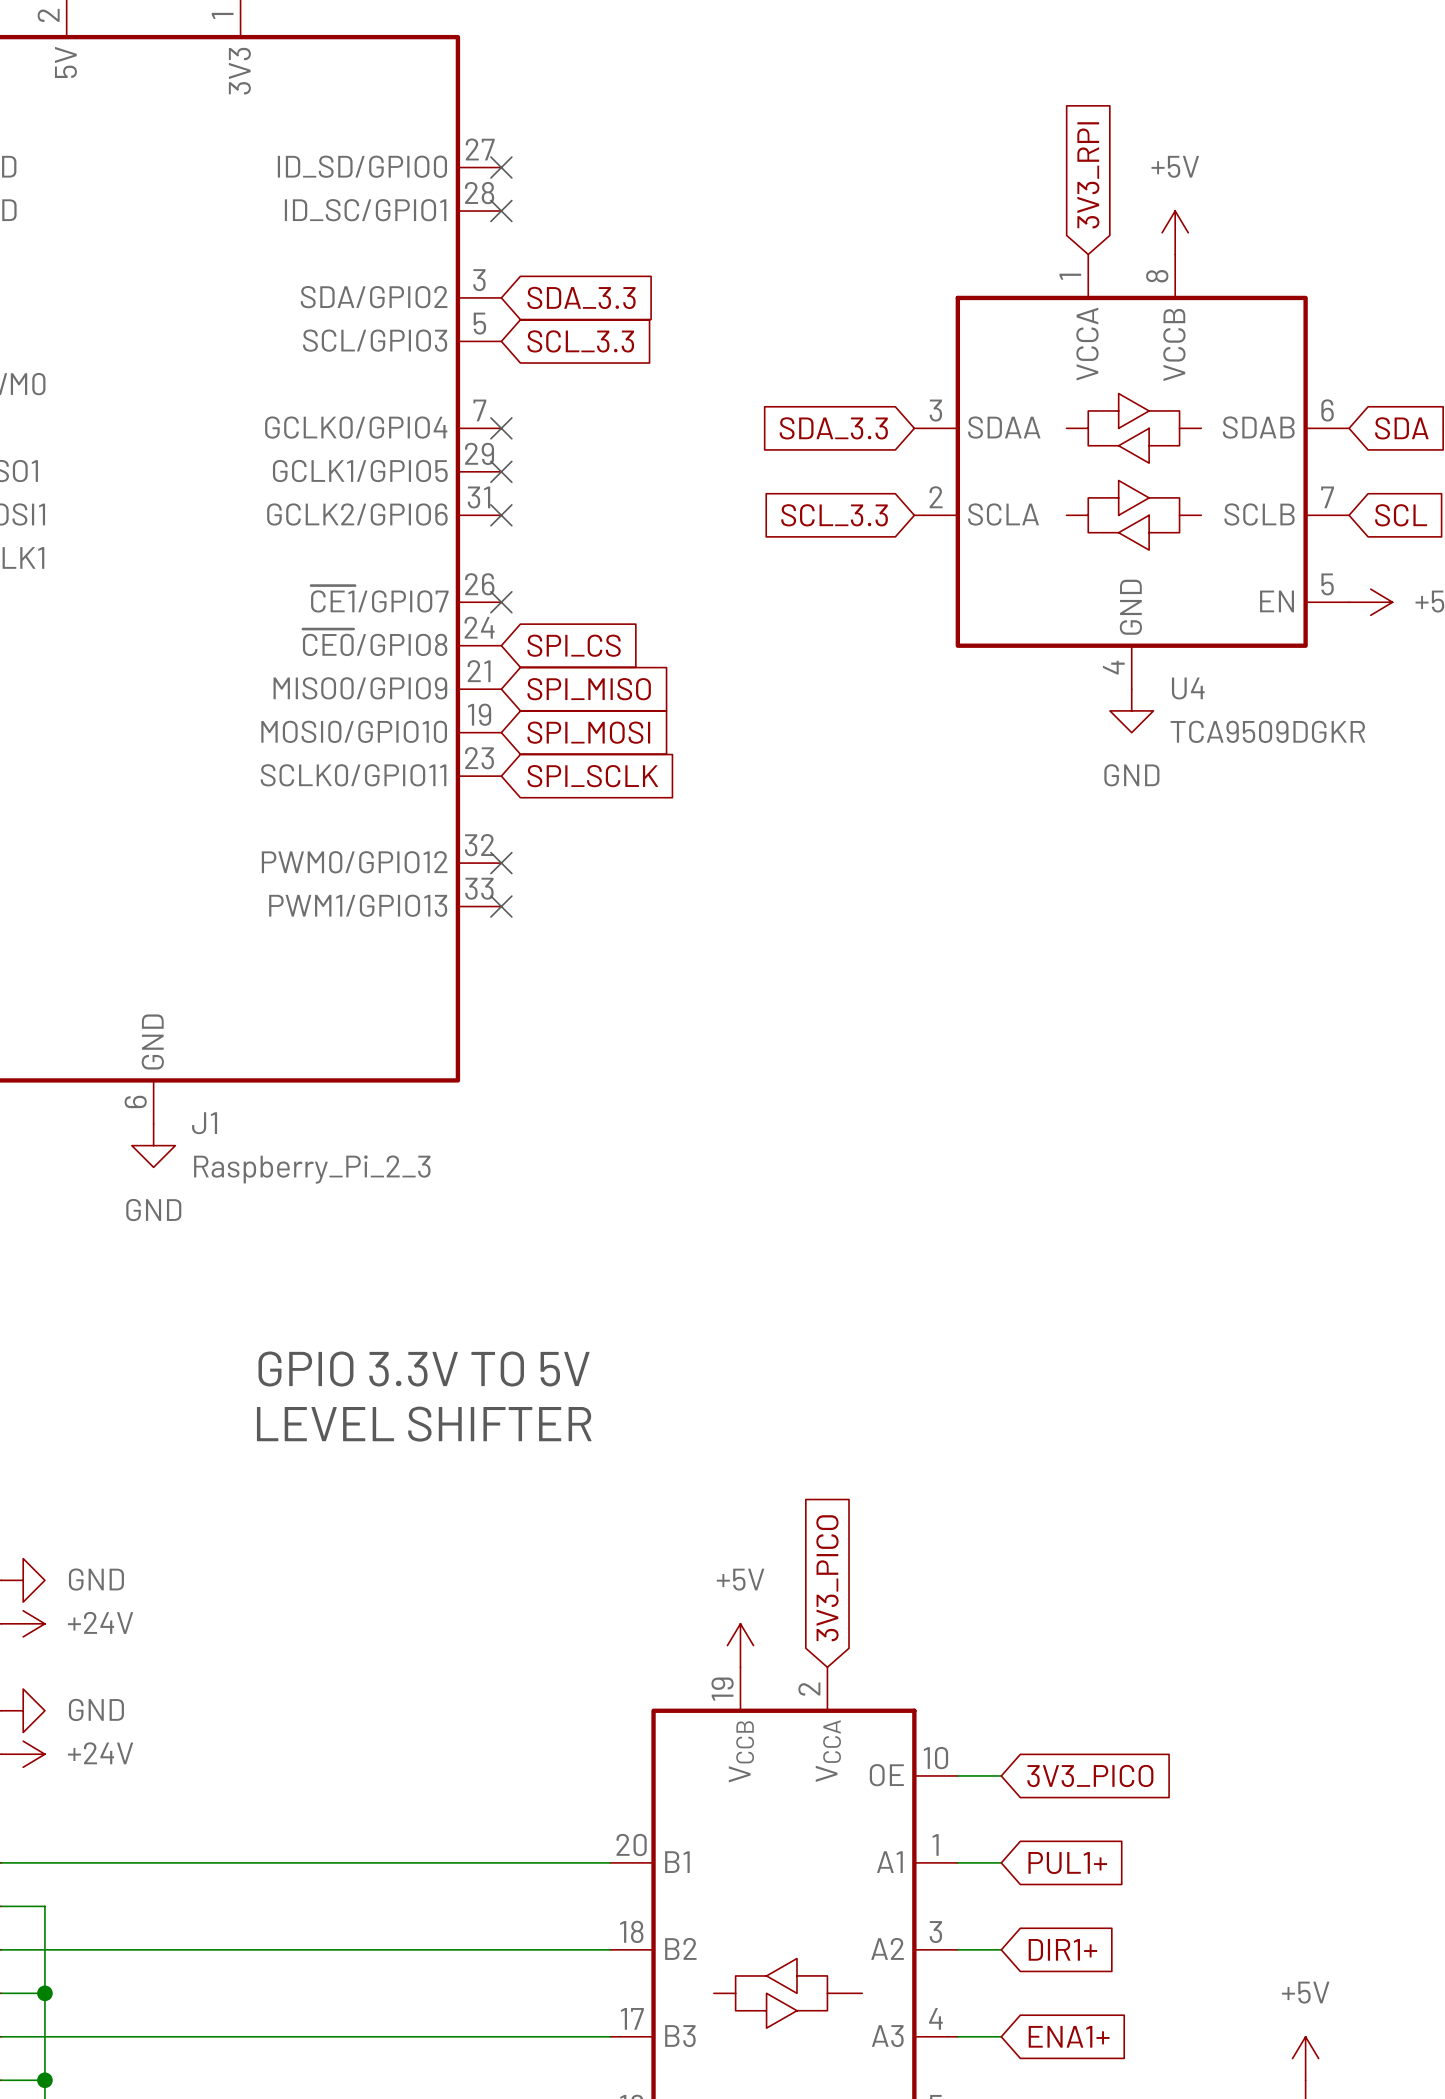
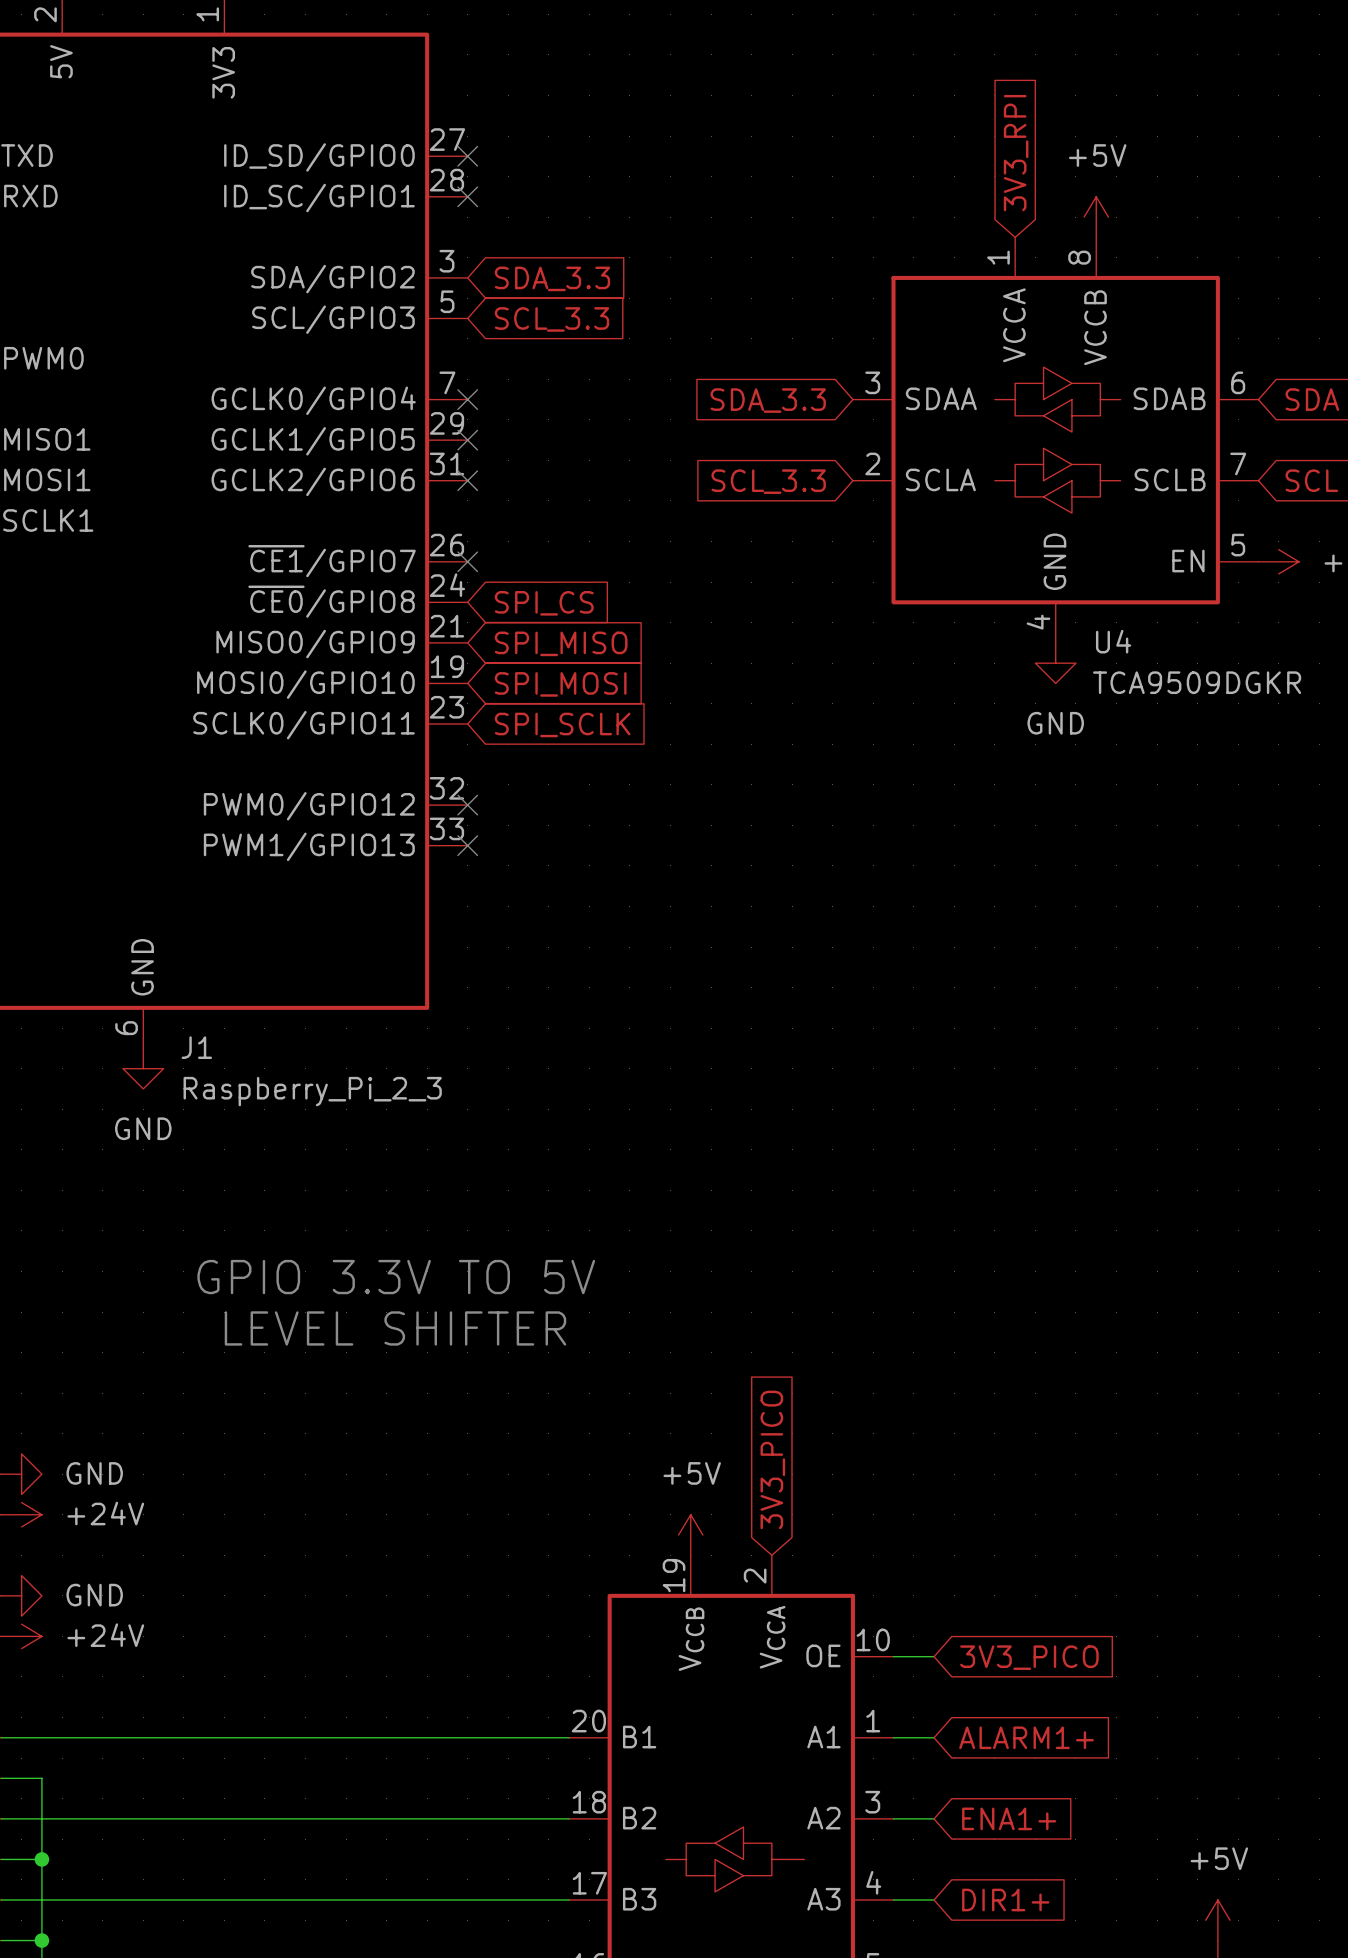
global label: PUL1+ (1067, 1863) -> ALARM1+ (1026, 1737)
global label: DIR1+ (1062, 1949) -> ENA1+ (1009, 1818)
global label: ENA1+ (1069, 2036) -> DIR1+ (1005, 1899)

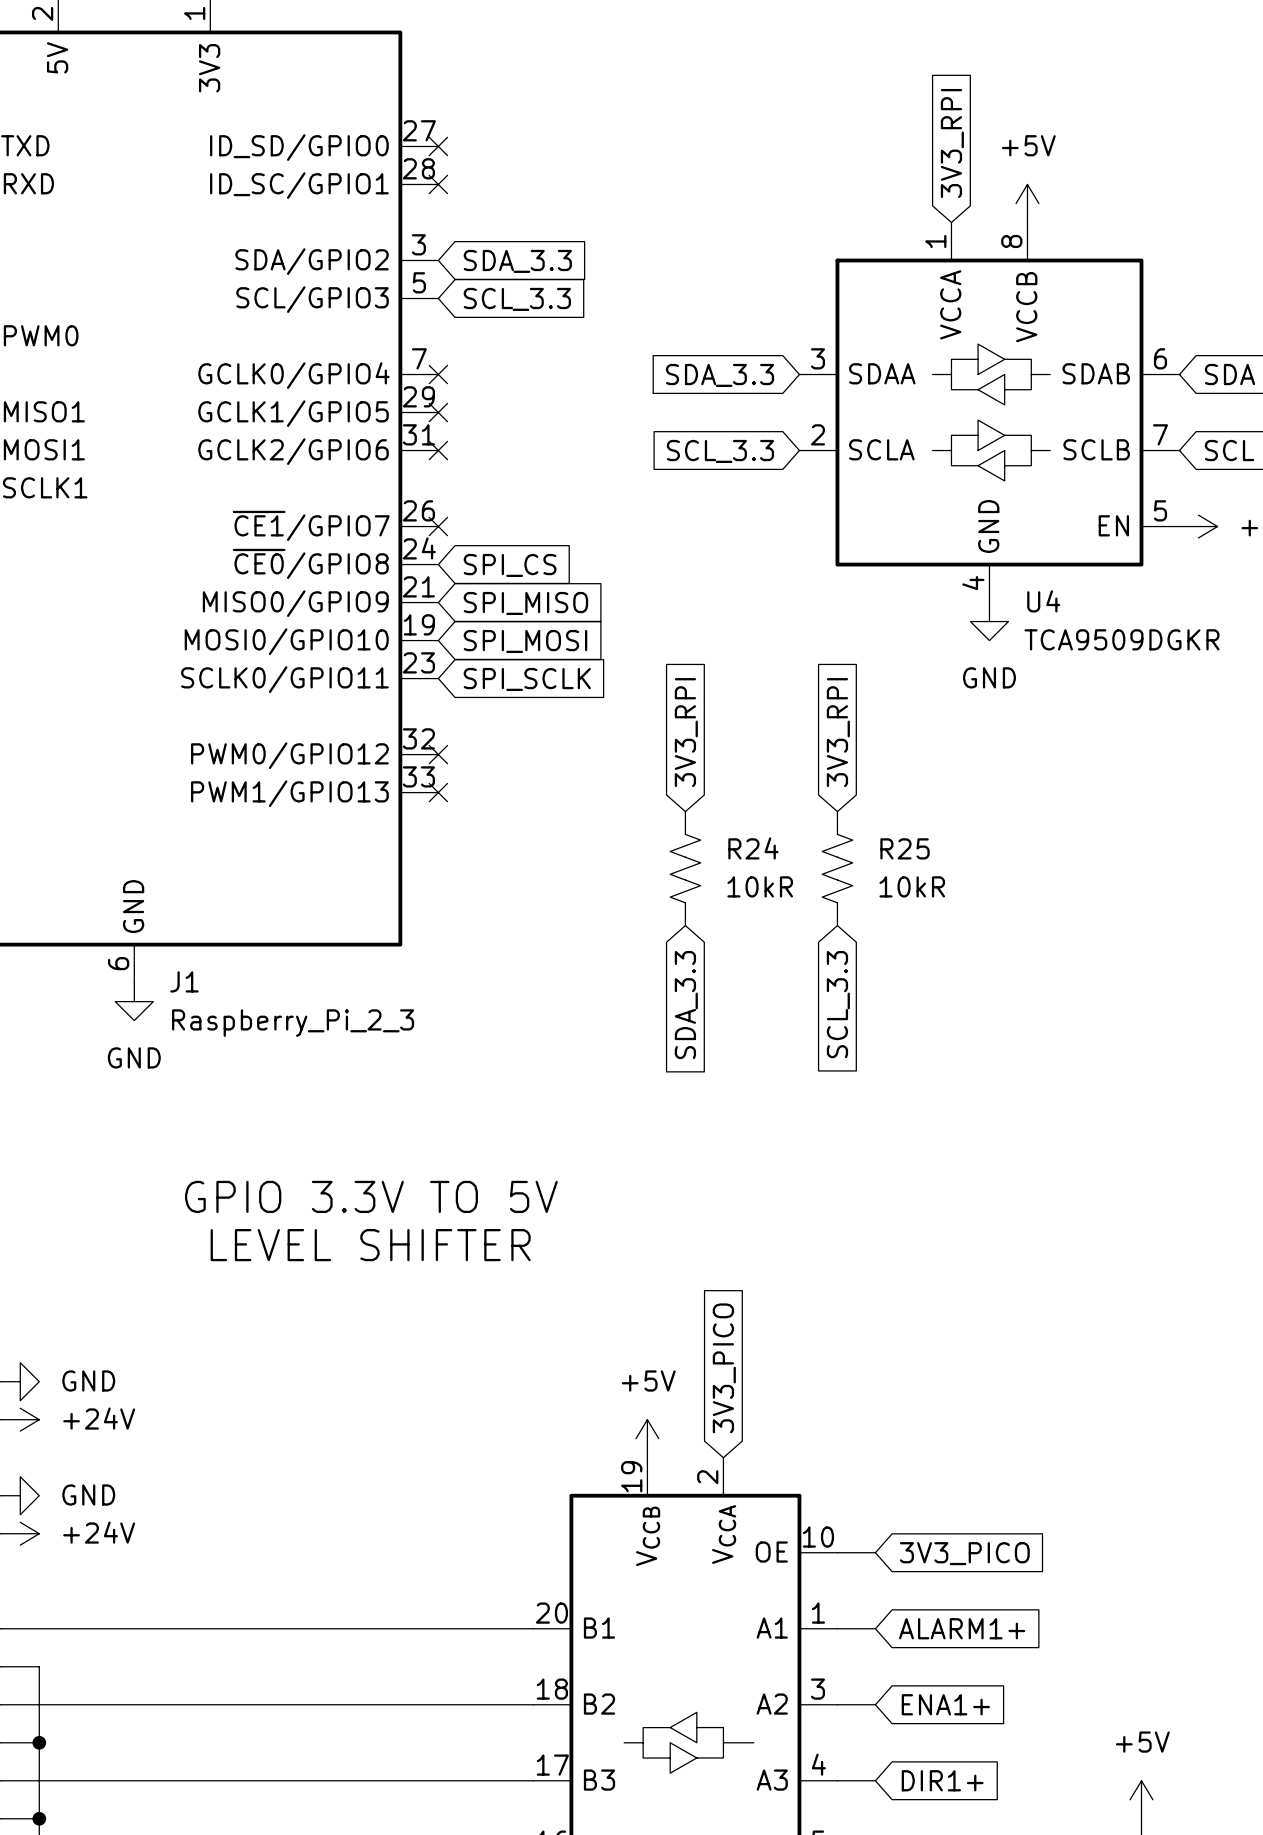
global label: none -> 3V3_RPI (686, 732)
global label: none -> 3V3_RPI (838, 732)
R24: none -> 10kR (685, 868)
R25: none -> 10kR (837, 868)
global label: none -> SCL_3.3 (838, 1004)
global label: none -> SDA_3.3 (686, 1005)

